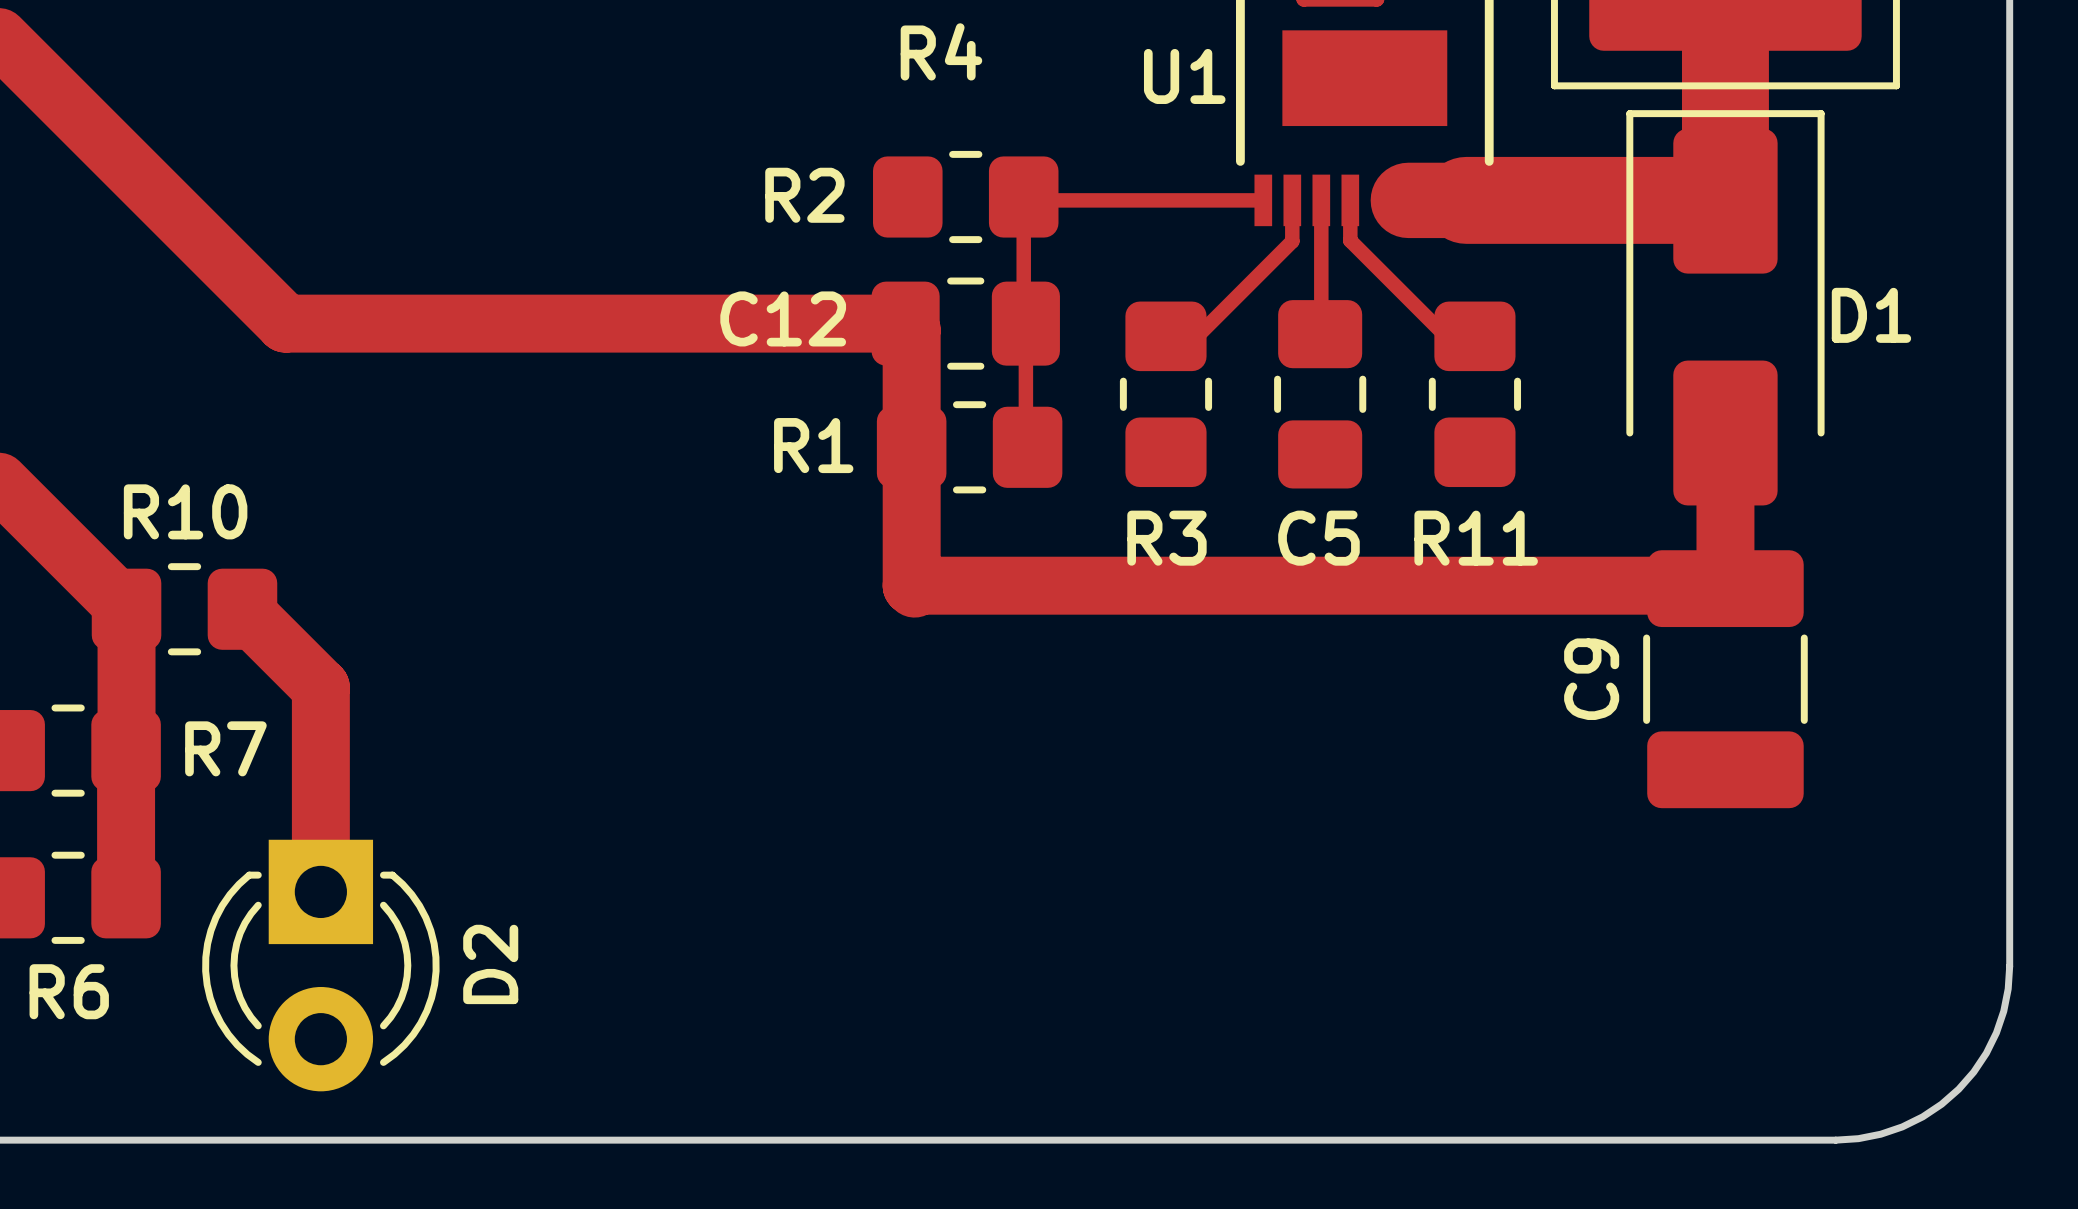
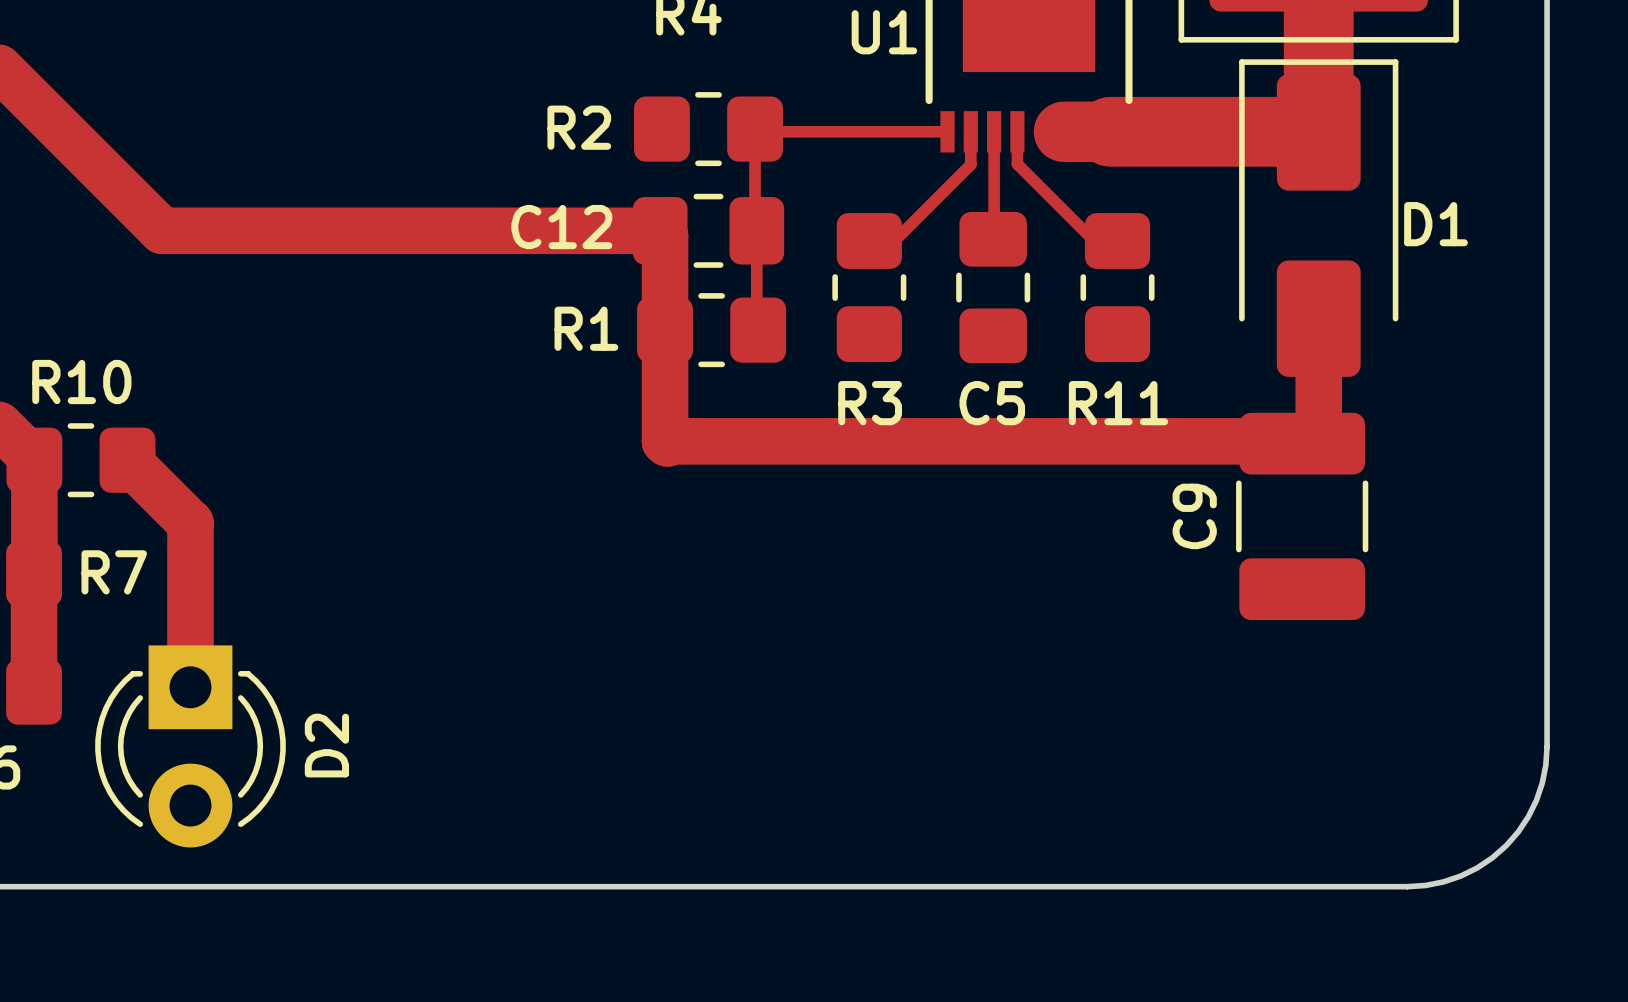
C9 position: (1725, 679) -> (1302, 516)

